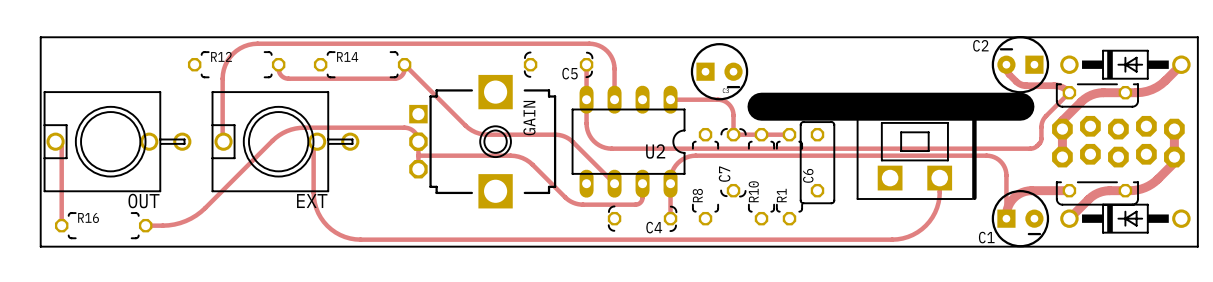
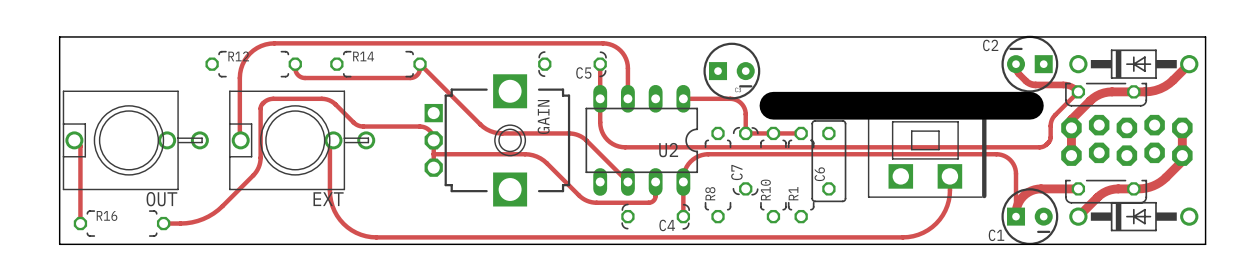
track: (347, 127) (299, 127) (287, 131) (275, 137) (236, 177) -> (363, 126) (354, 123) (333, 102) (326, 99) (267, 99) (260, 107) (260, 160) (253, 175)

